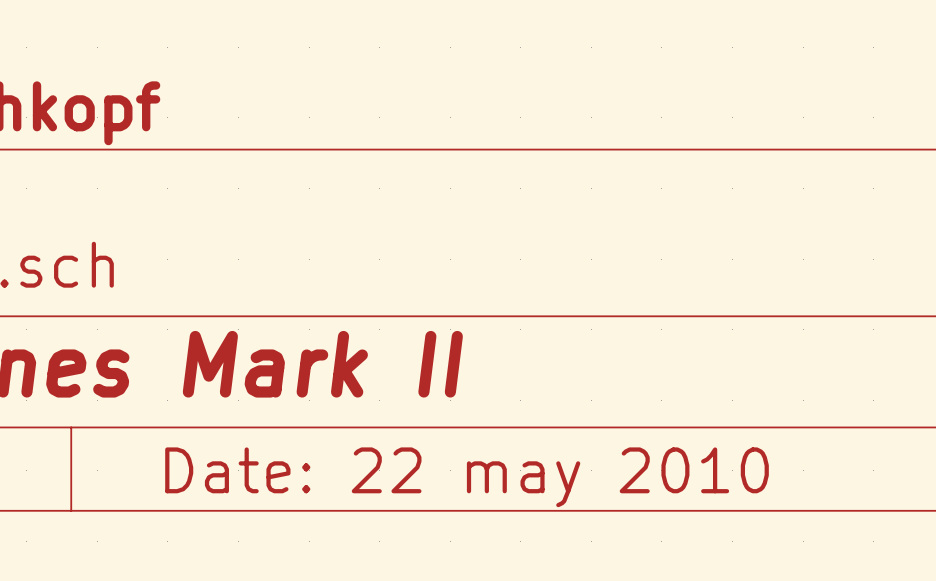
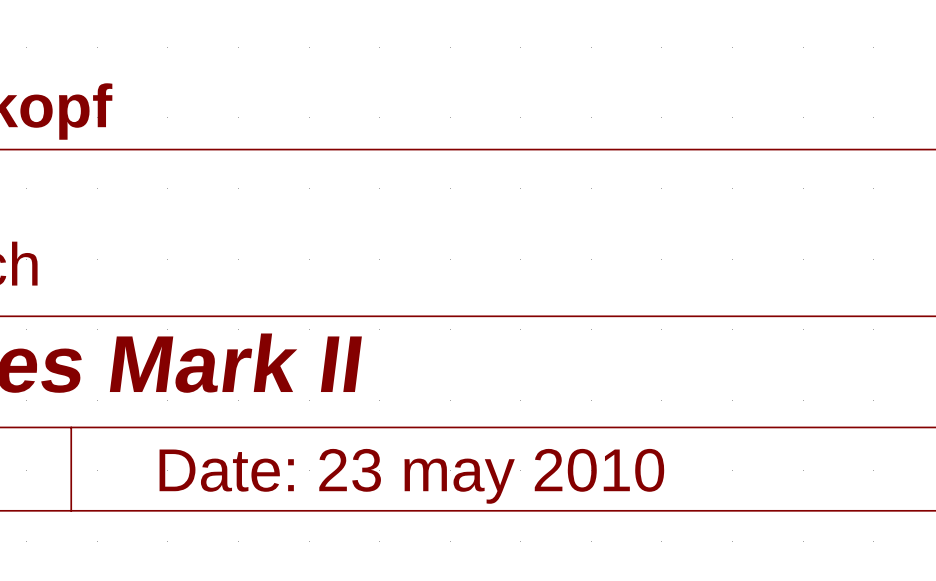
title block: Date: 22 may 2010 (467, 477) -> Date: 23 may 2010 (411, 476)

